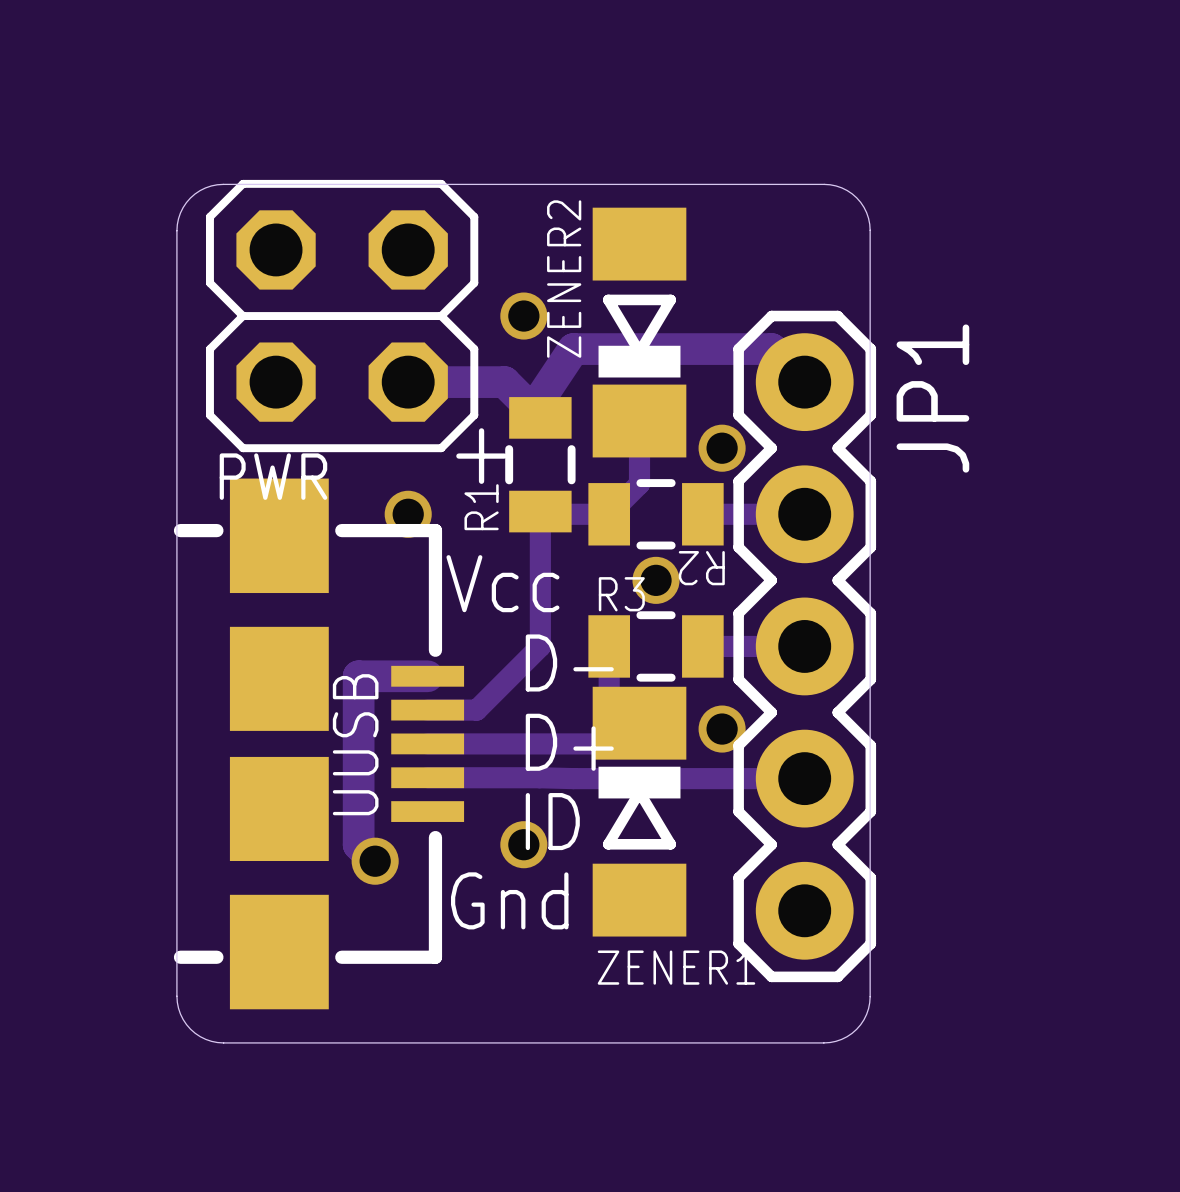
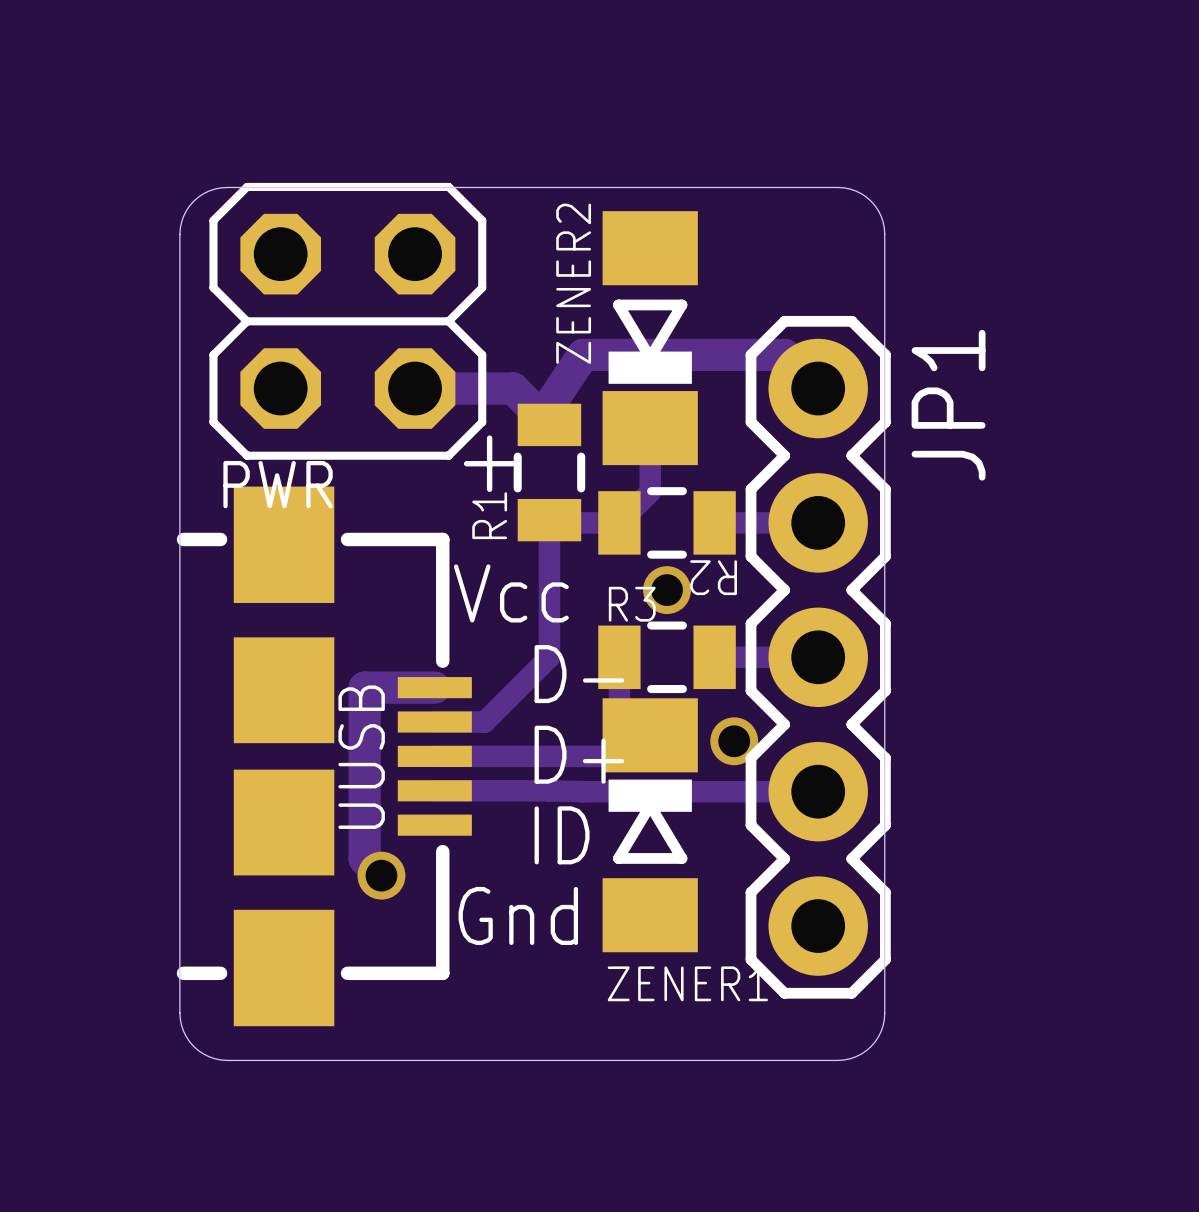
via: (523, 316) -> none
via: (722, 448) -> none
via: (408, 514) -> none
via: (523, 844) -> none

